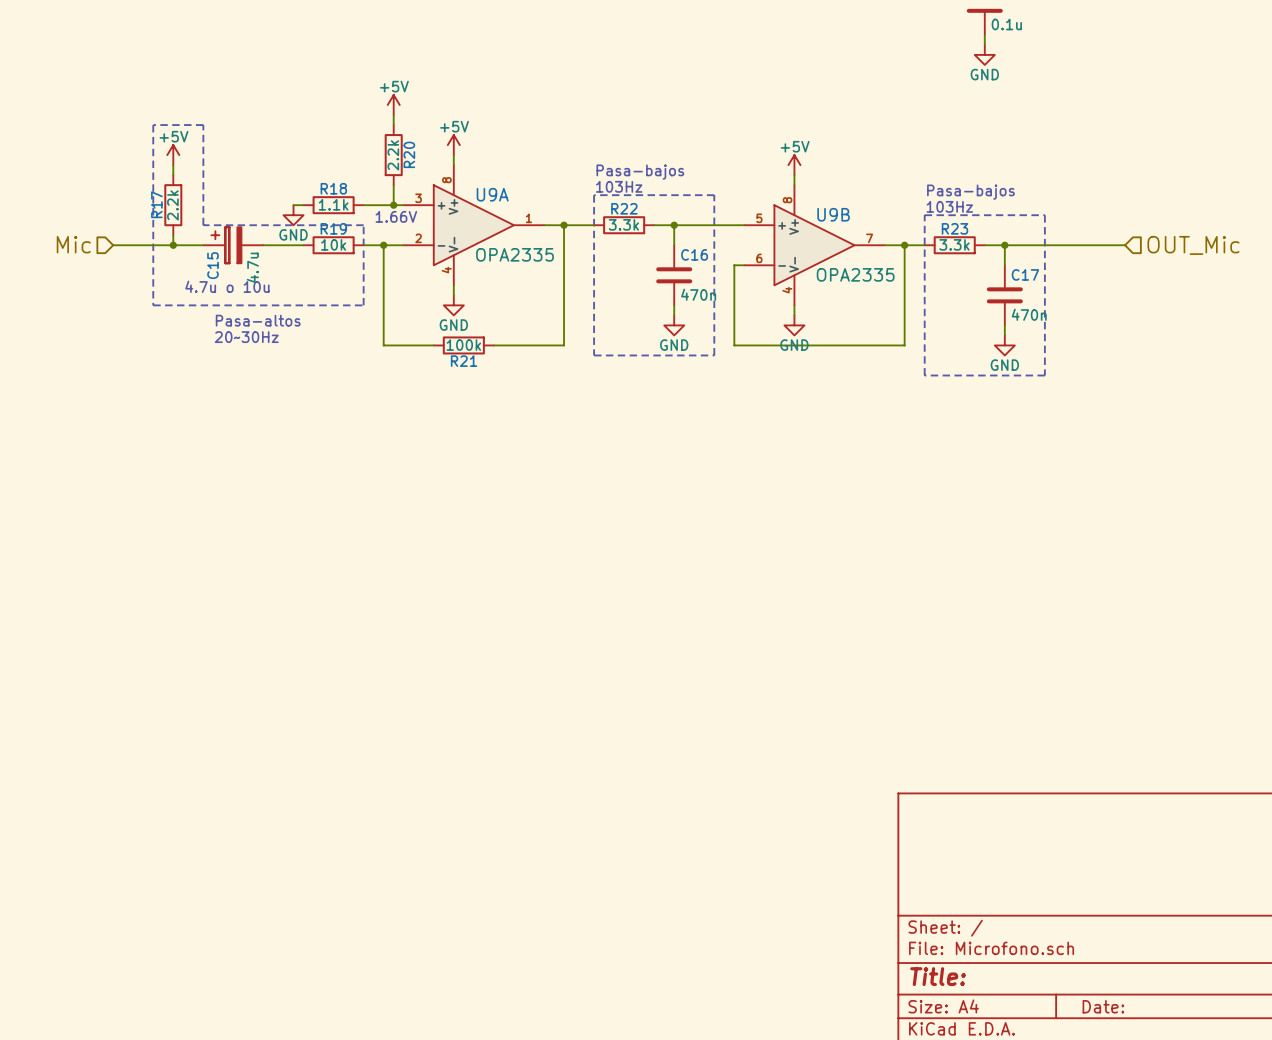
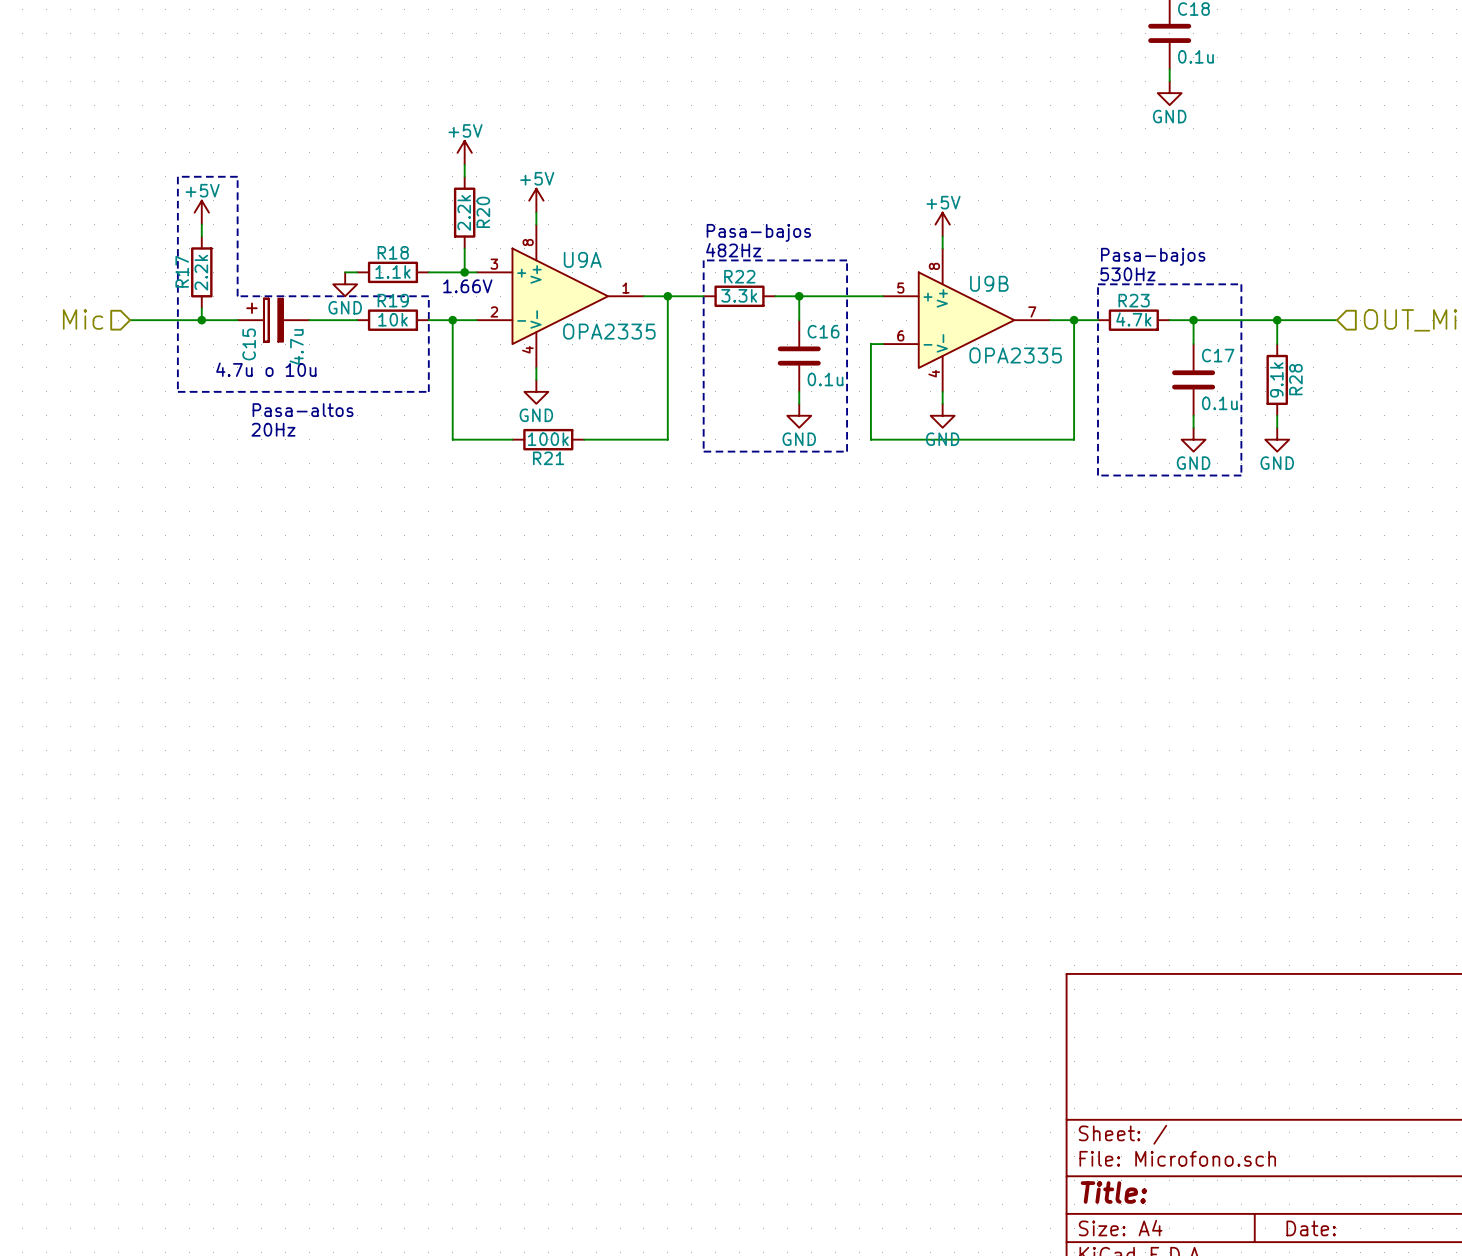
text: 103Hz (619, 186) -> 482Hz (733, 250)
text: 103Hz (949, 206) -> 530Hz (1127, 274)
R23 value: 3.3k (954, 244) -> 4.7k (1133, 319)
wire: none -> (1277, 320) (1277, 344)
junction: none -> (1277, 320)
C16 value: 470n (698, 294) -> 0.1u (825, 379)
R28: none -> 9.1k (1277, 379)
C17 value: 470n (1029, 314) -> 0.1u (1219, 403)
wire: none -> (1277, 415) (1277, 427)
text: 20~30Hz (246, 337) -> 20Hz (273, 429)
power symbol: none -> GND (1277, 439)

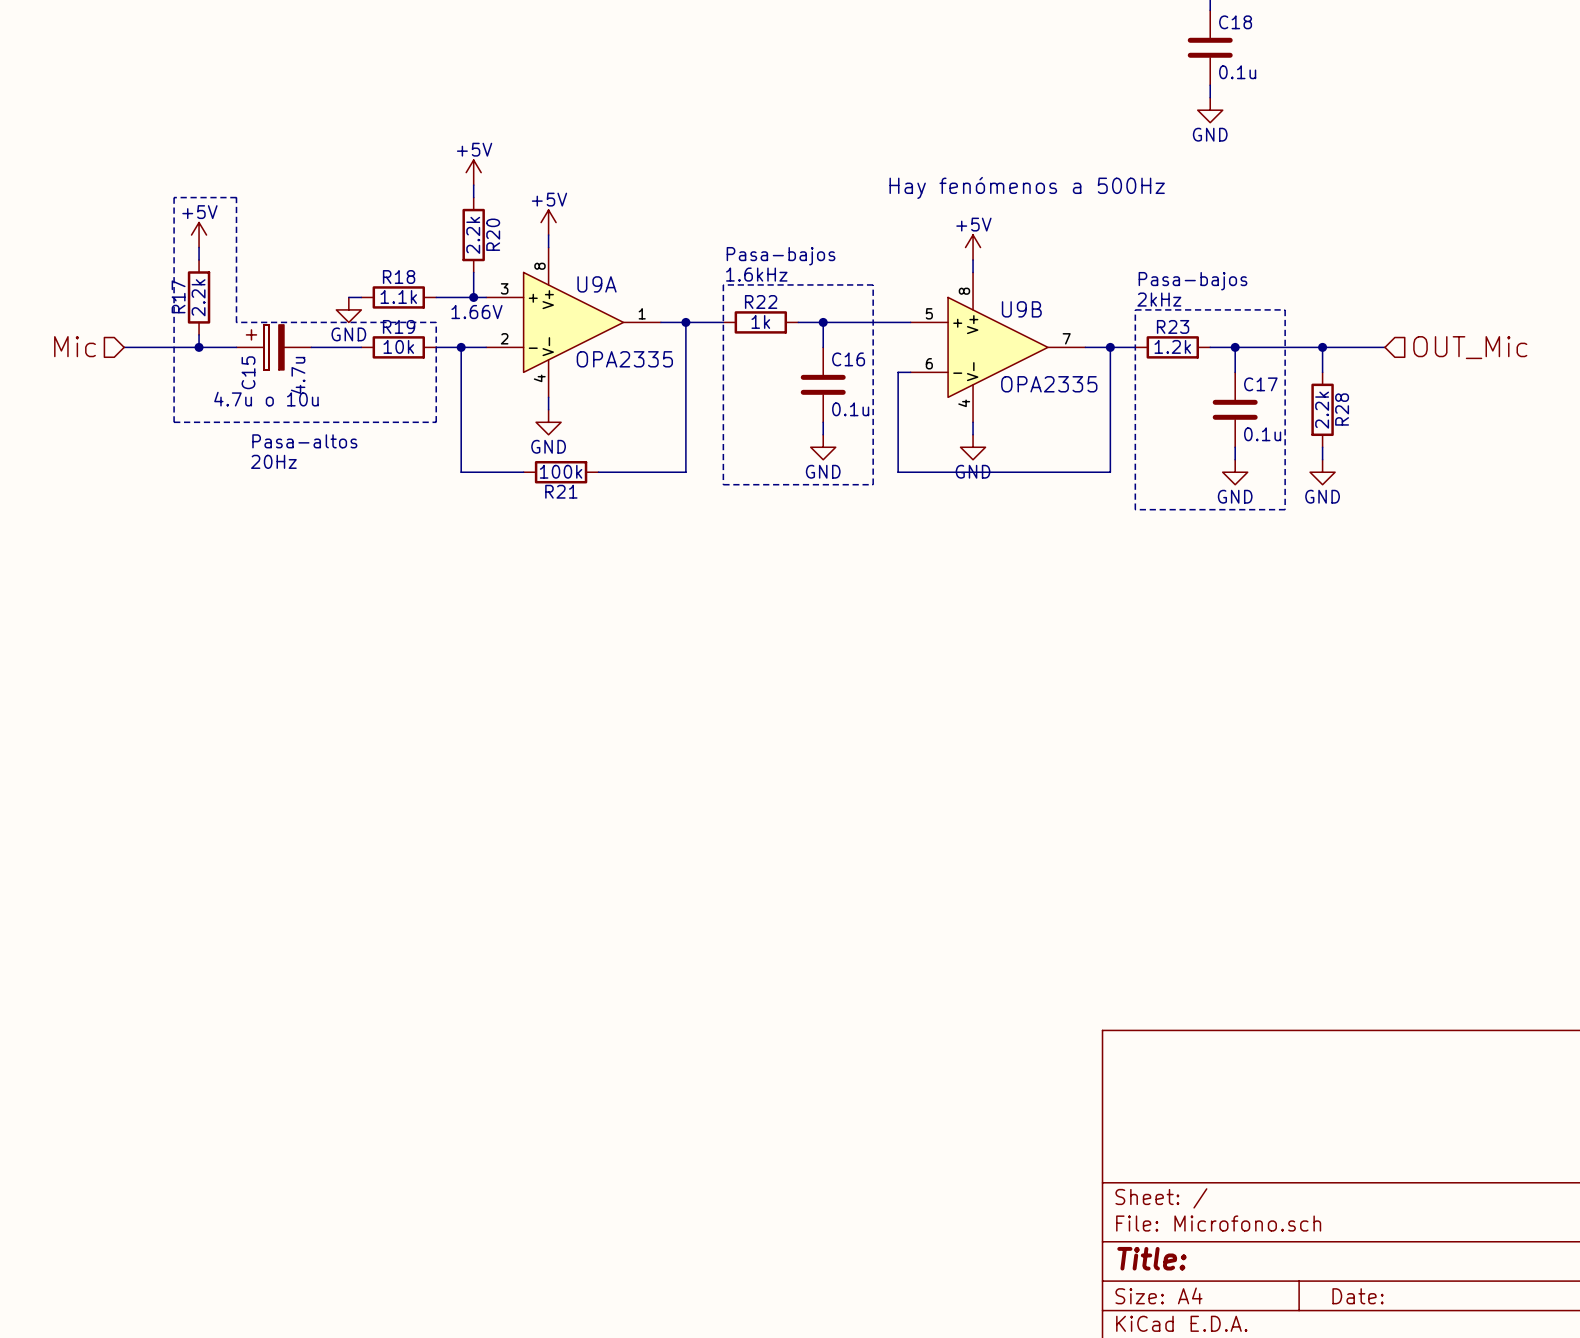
text: none -> Hay fenómenos a 500Hz (1027, 187)
text: 482Hz (733, 250) -> 1.6kHz (756, 274)
text: 530Hz (1127, 274) -> 2kHz (1159, 299)
R22 value: 3.3k (739, 295) -> 1k (760, 321)
R23 value: 4.7k (1133, 319) -> 1.2k (1172, 346)
R28 value: 9.1k (1276, 379) -> 2.2k (1322, 410)

